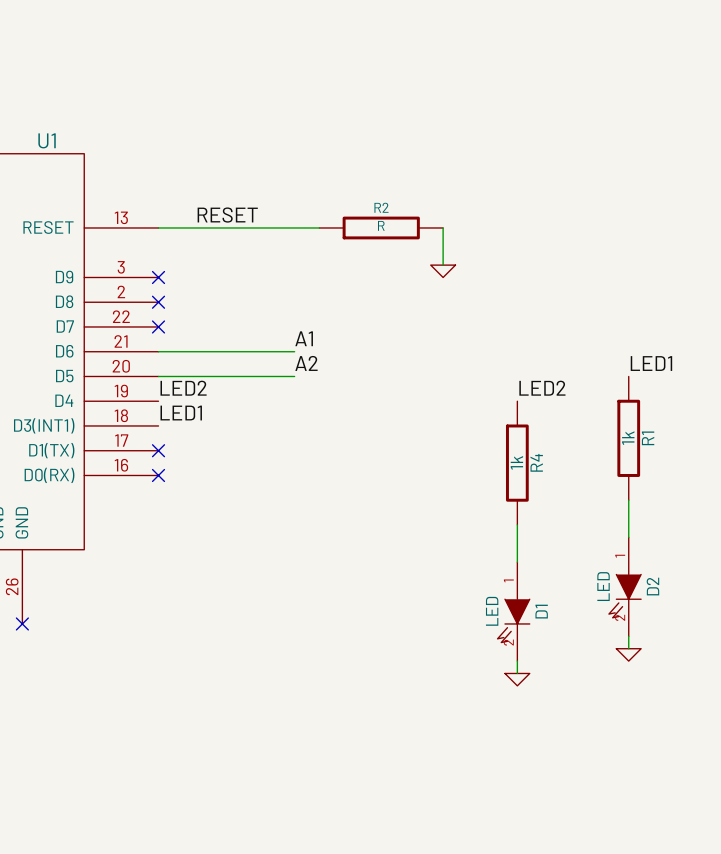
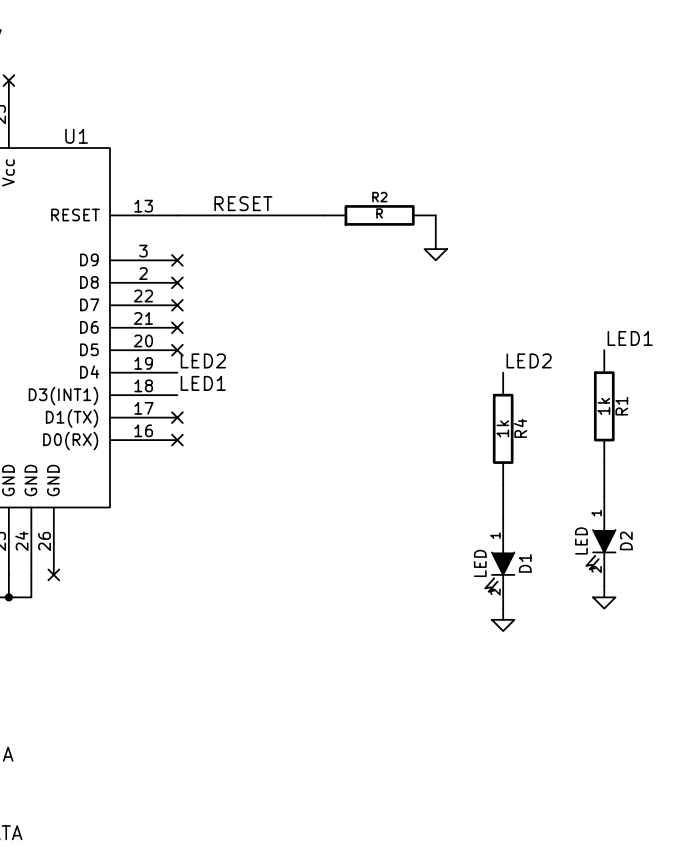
label: A1 (304, 338) -> none
wire: (158, 351) (294, 351) -> none
no-connect mark: none -> (177, 327)
label: A2 (306, 363) -> none
wire: (158, 376) (294, 376) -> none
no-connect mark: none -> (177, 350)

